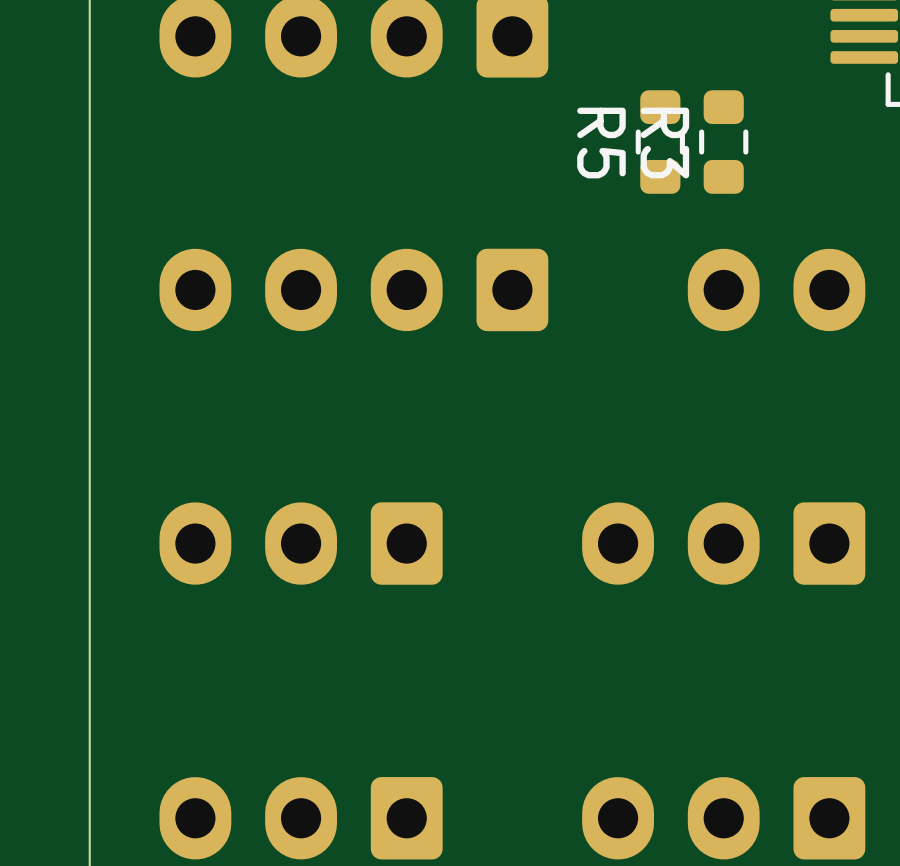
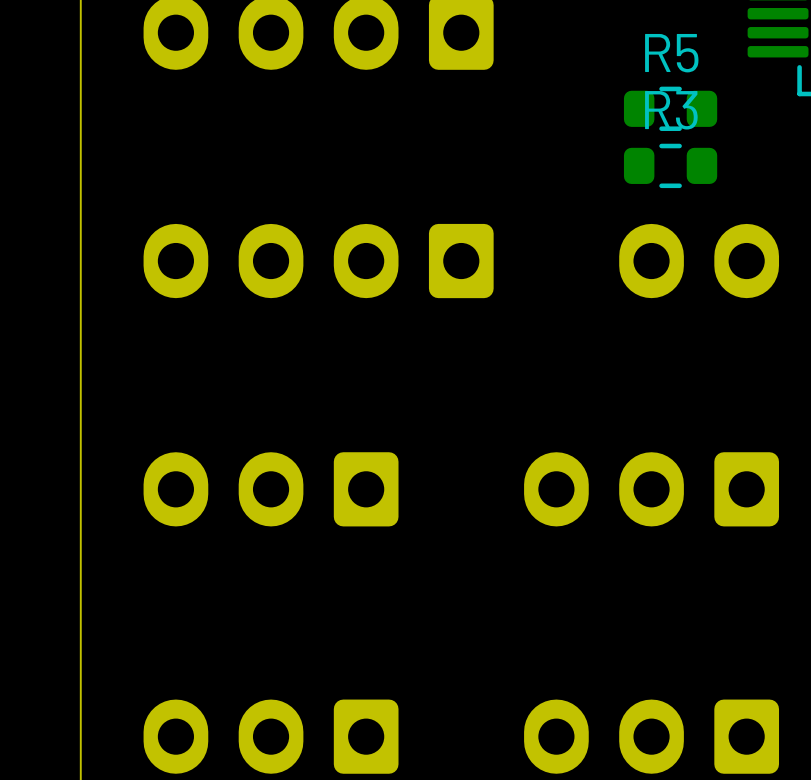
R5 rotation: 0° (660, 142) -> 90° clockwise (670, 108)
R5 position: (660, 142) -> (670, 108)
R3 rotation: 0° (723, 142) -> 90° clockwise (670, 165)

